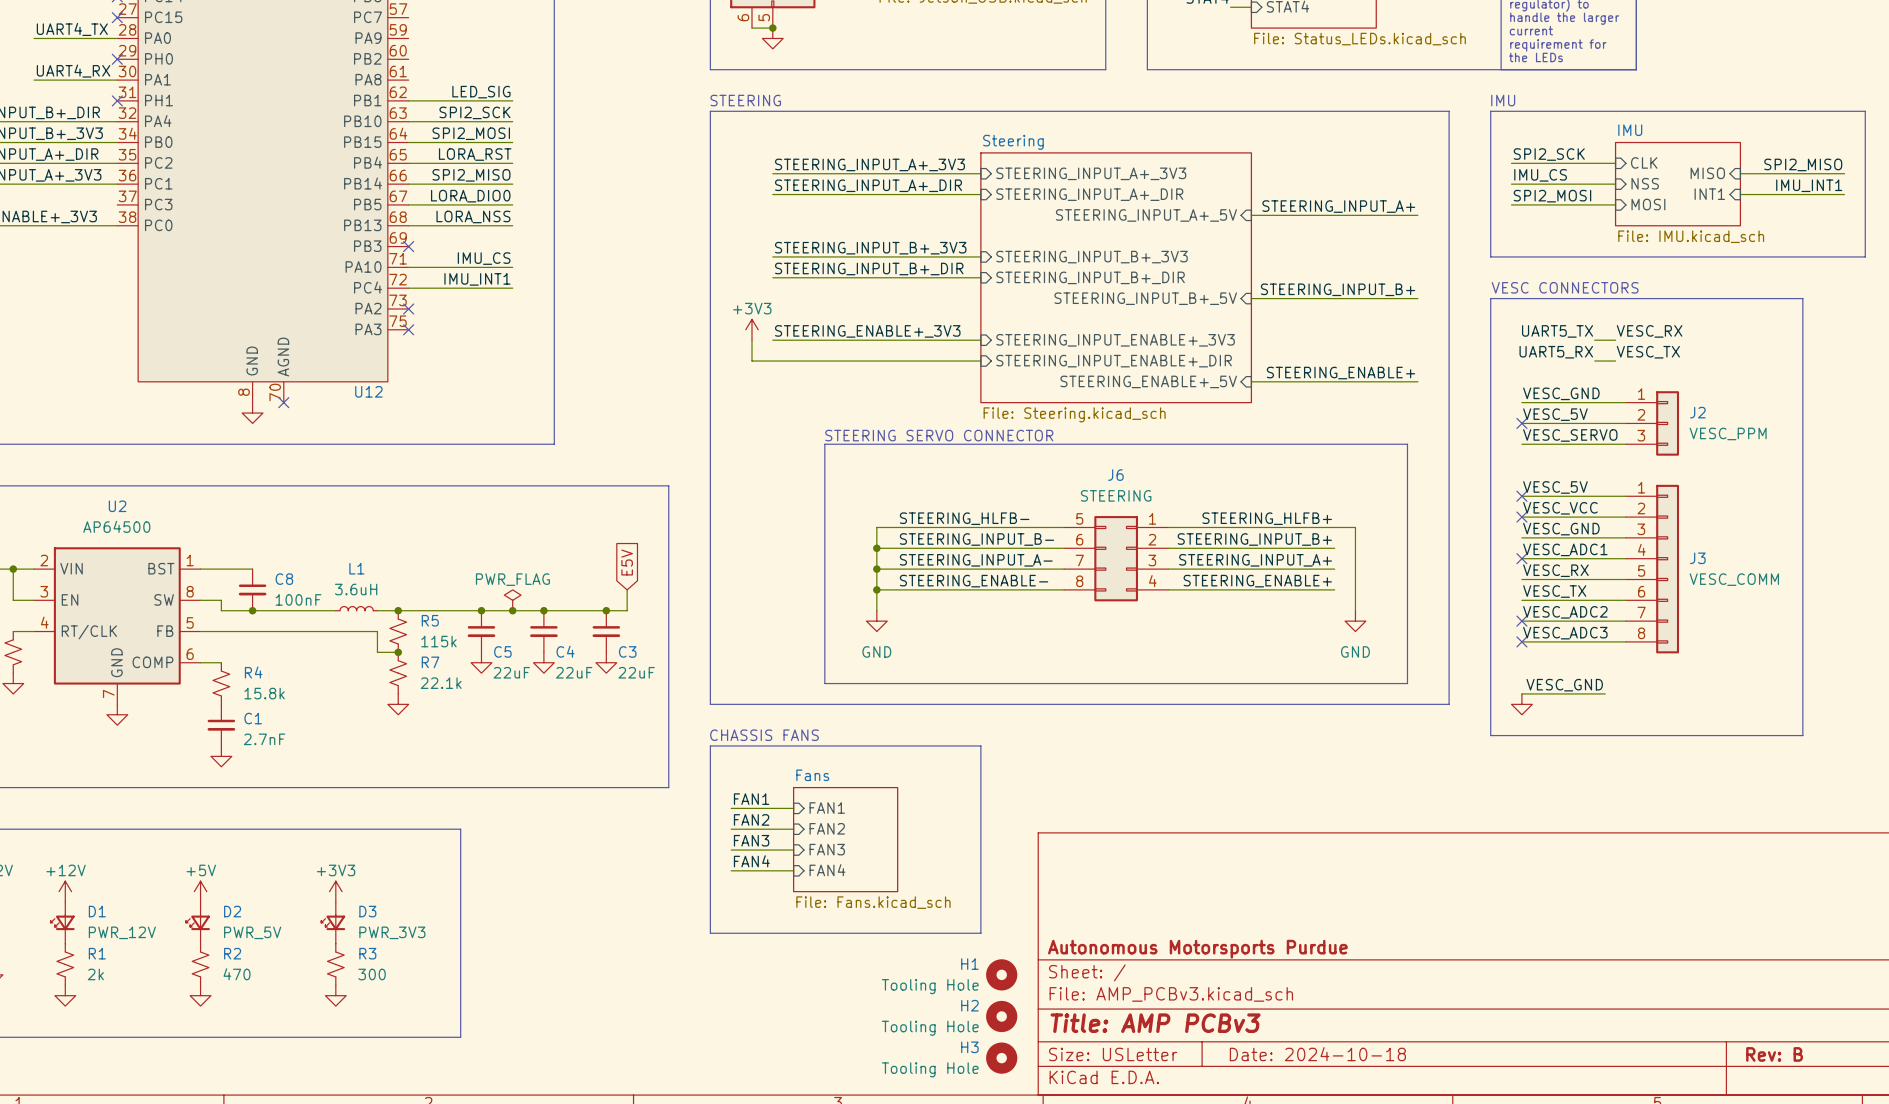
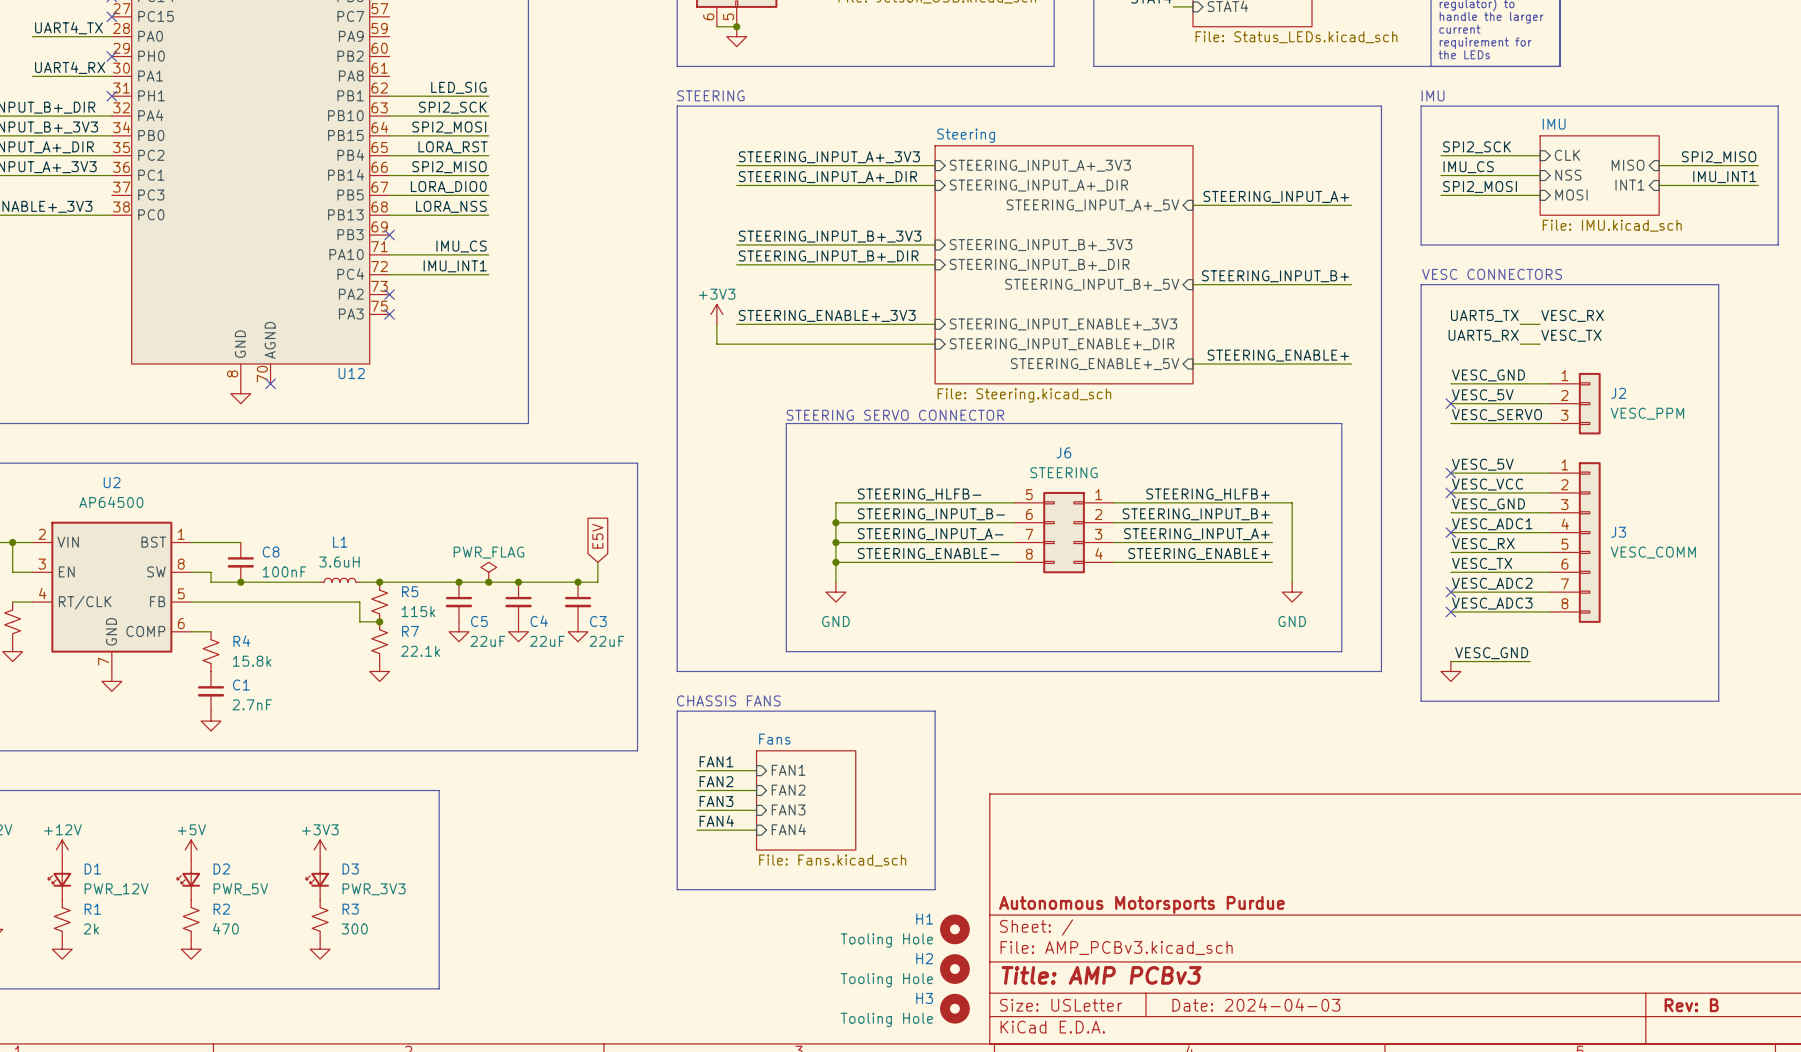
title block: Date: 2024-10-18 (1317, 1054) -> Date: 2024-04-03 (1256, 1004)

